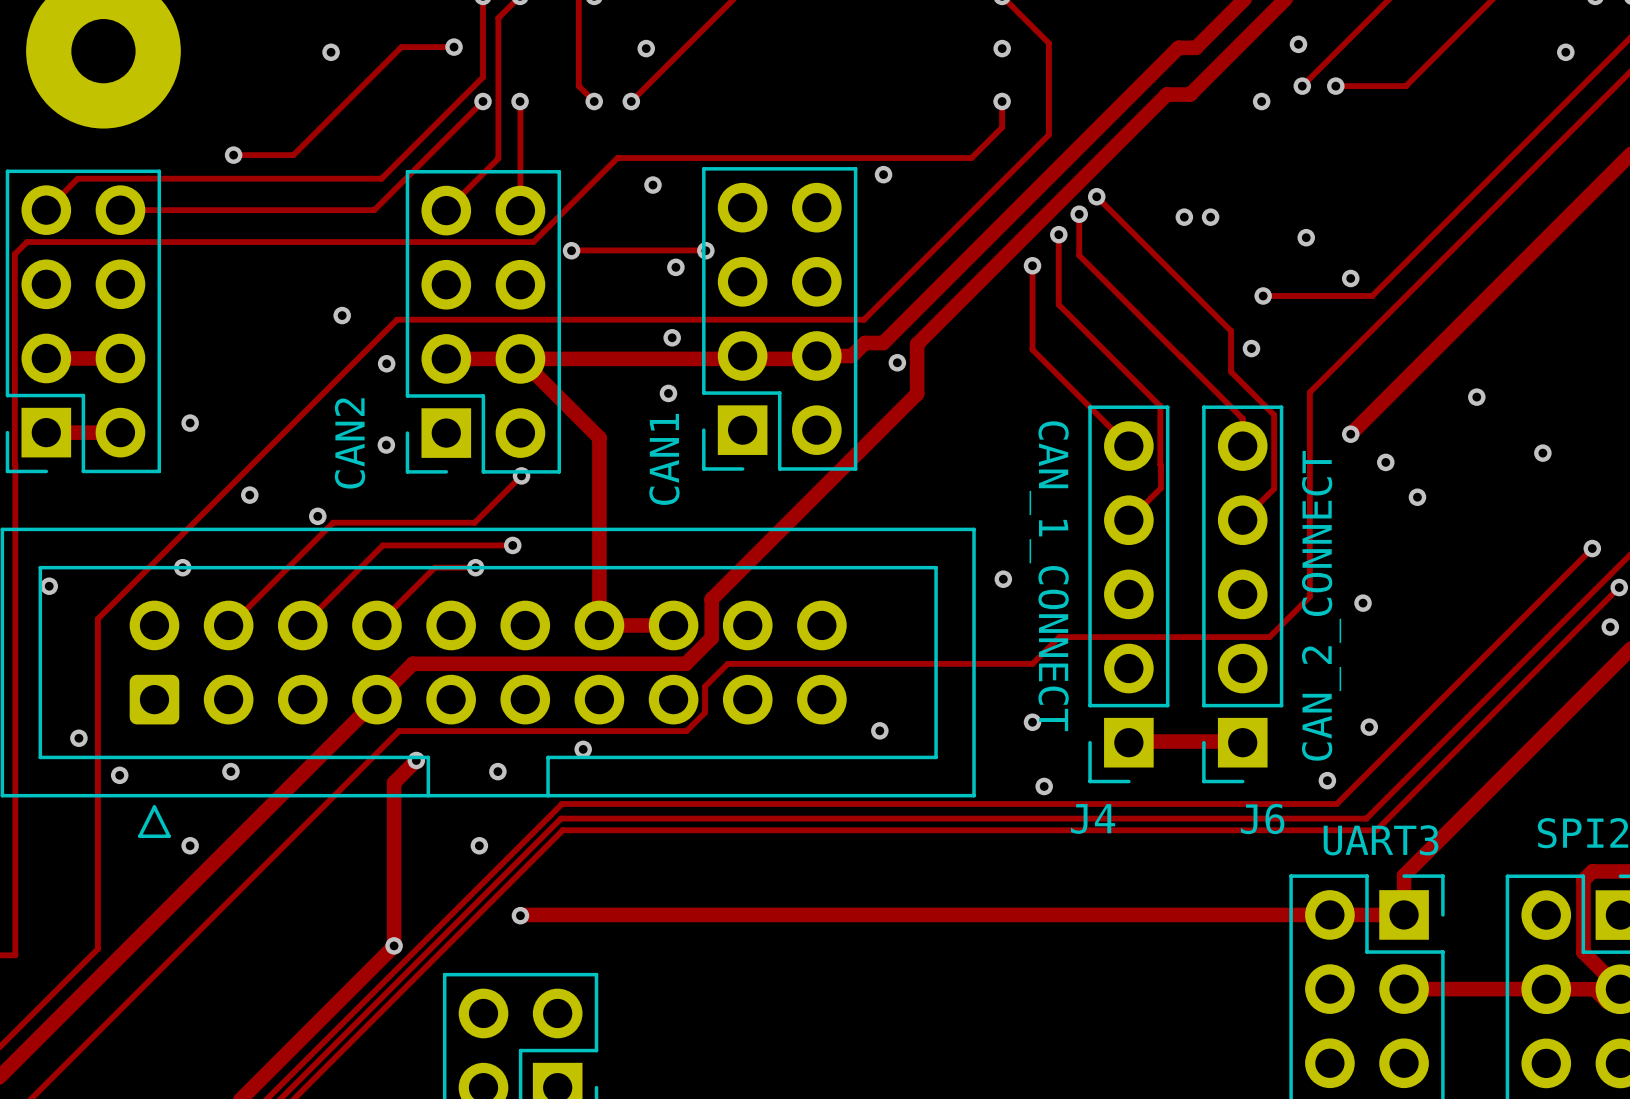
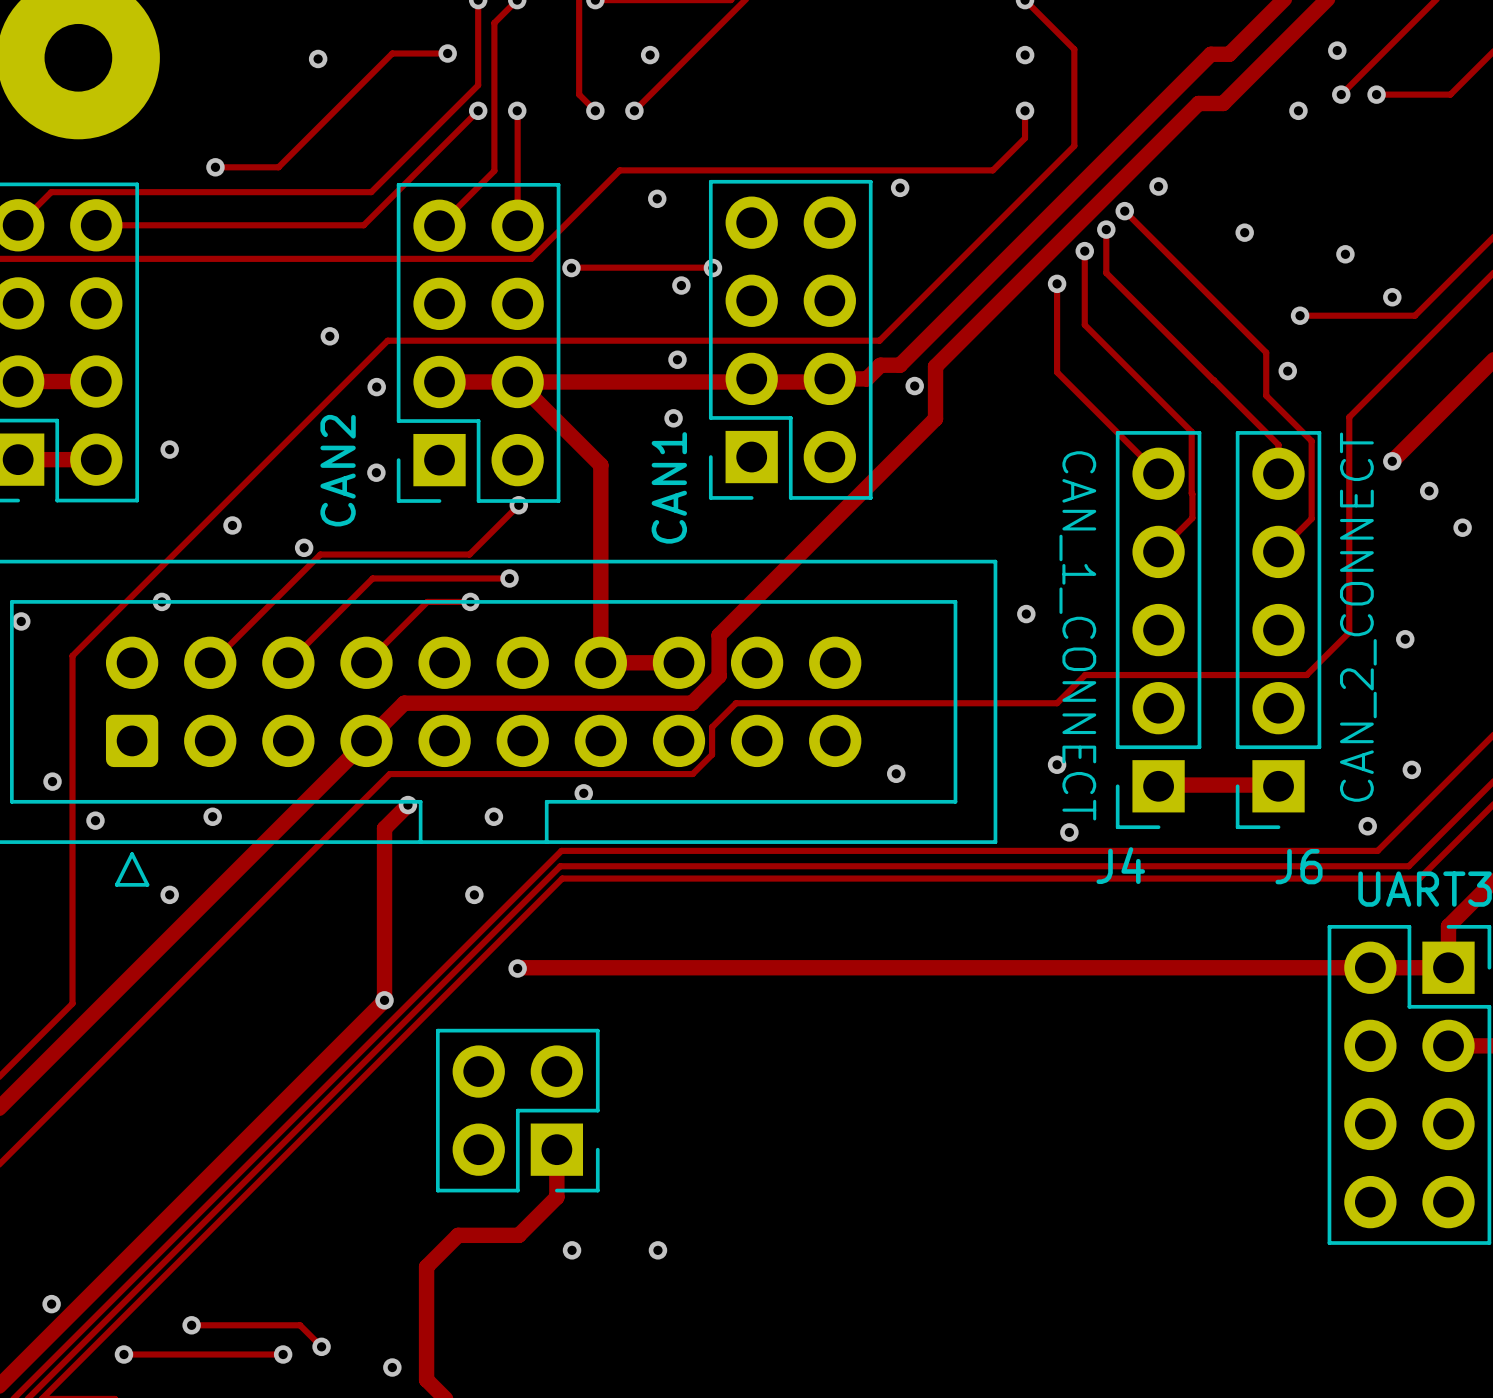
via position: (1184, 217) -> (1158, 186)

